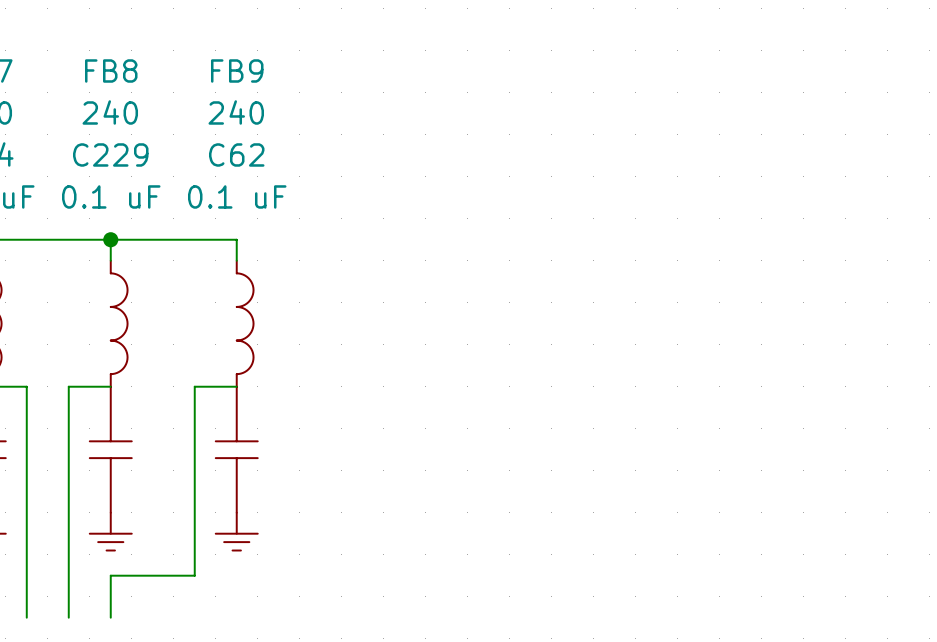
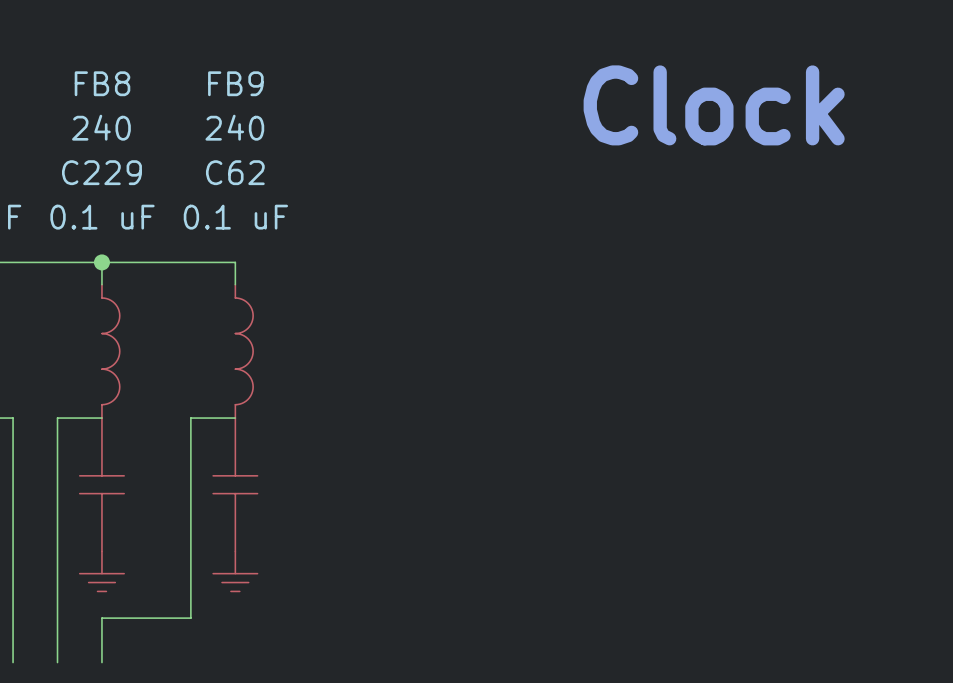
text: none -> Clock (714, 105)

